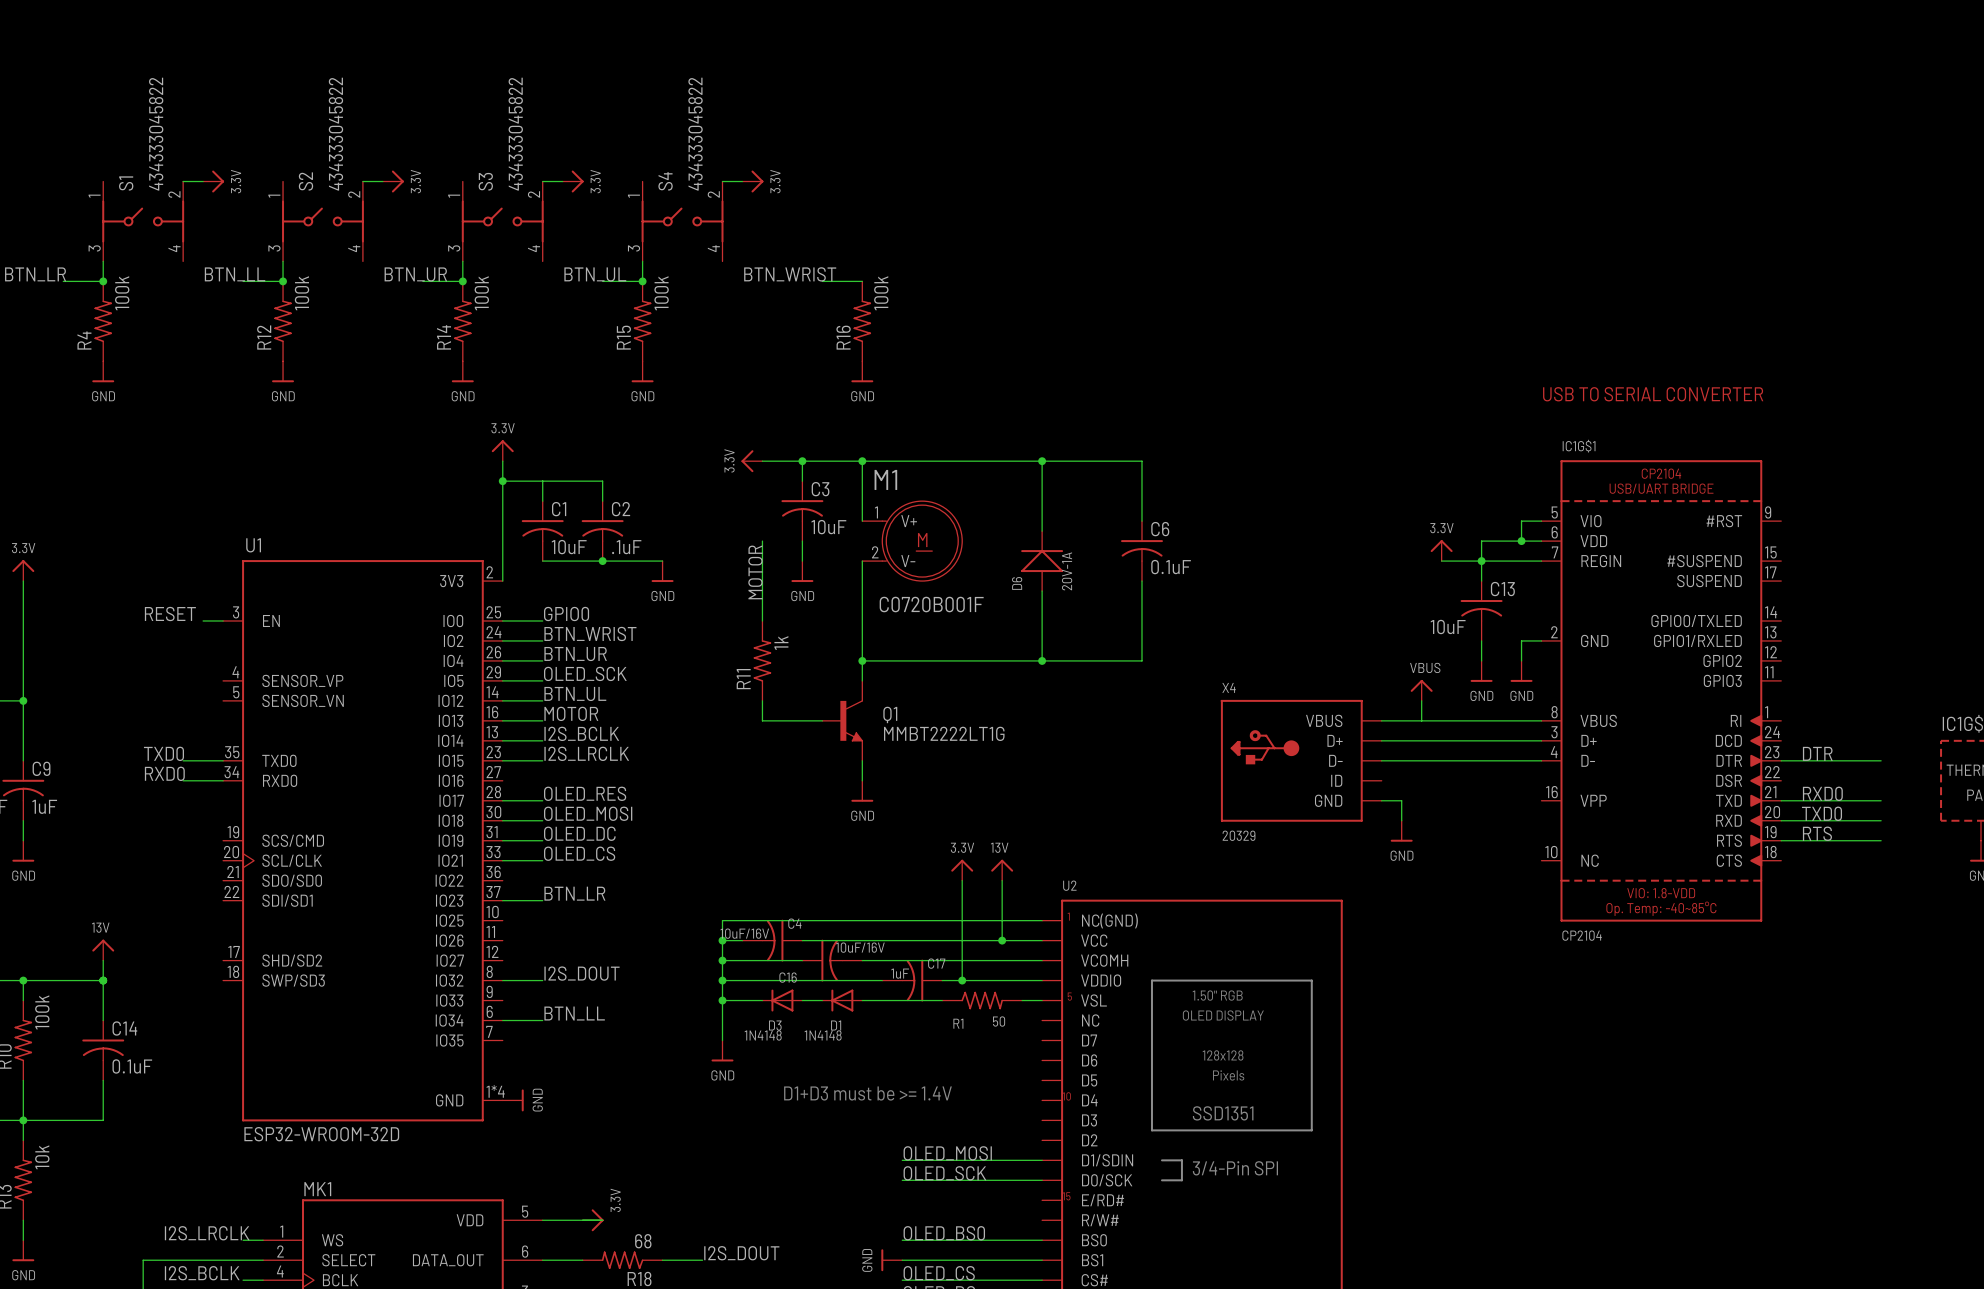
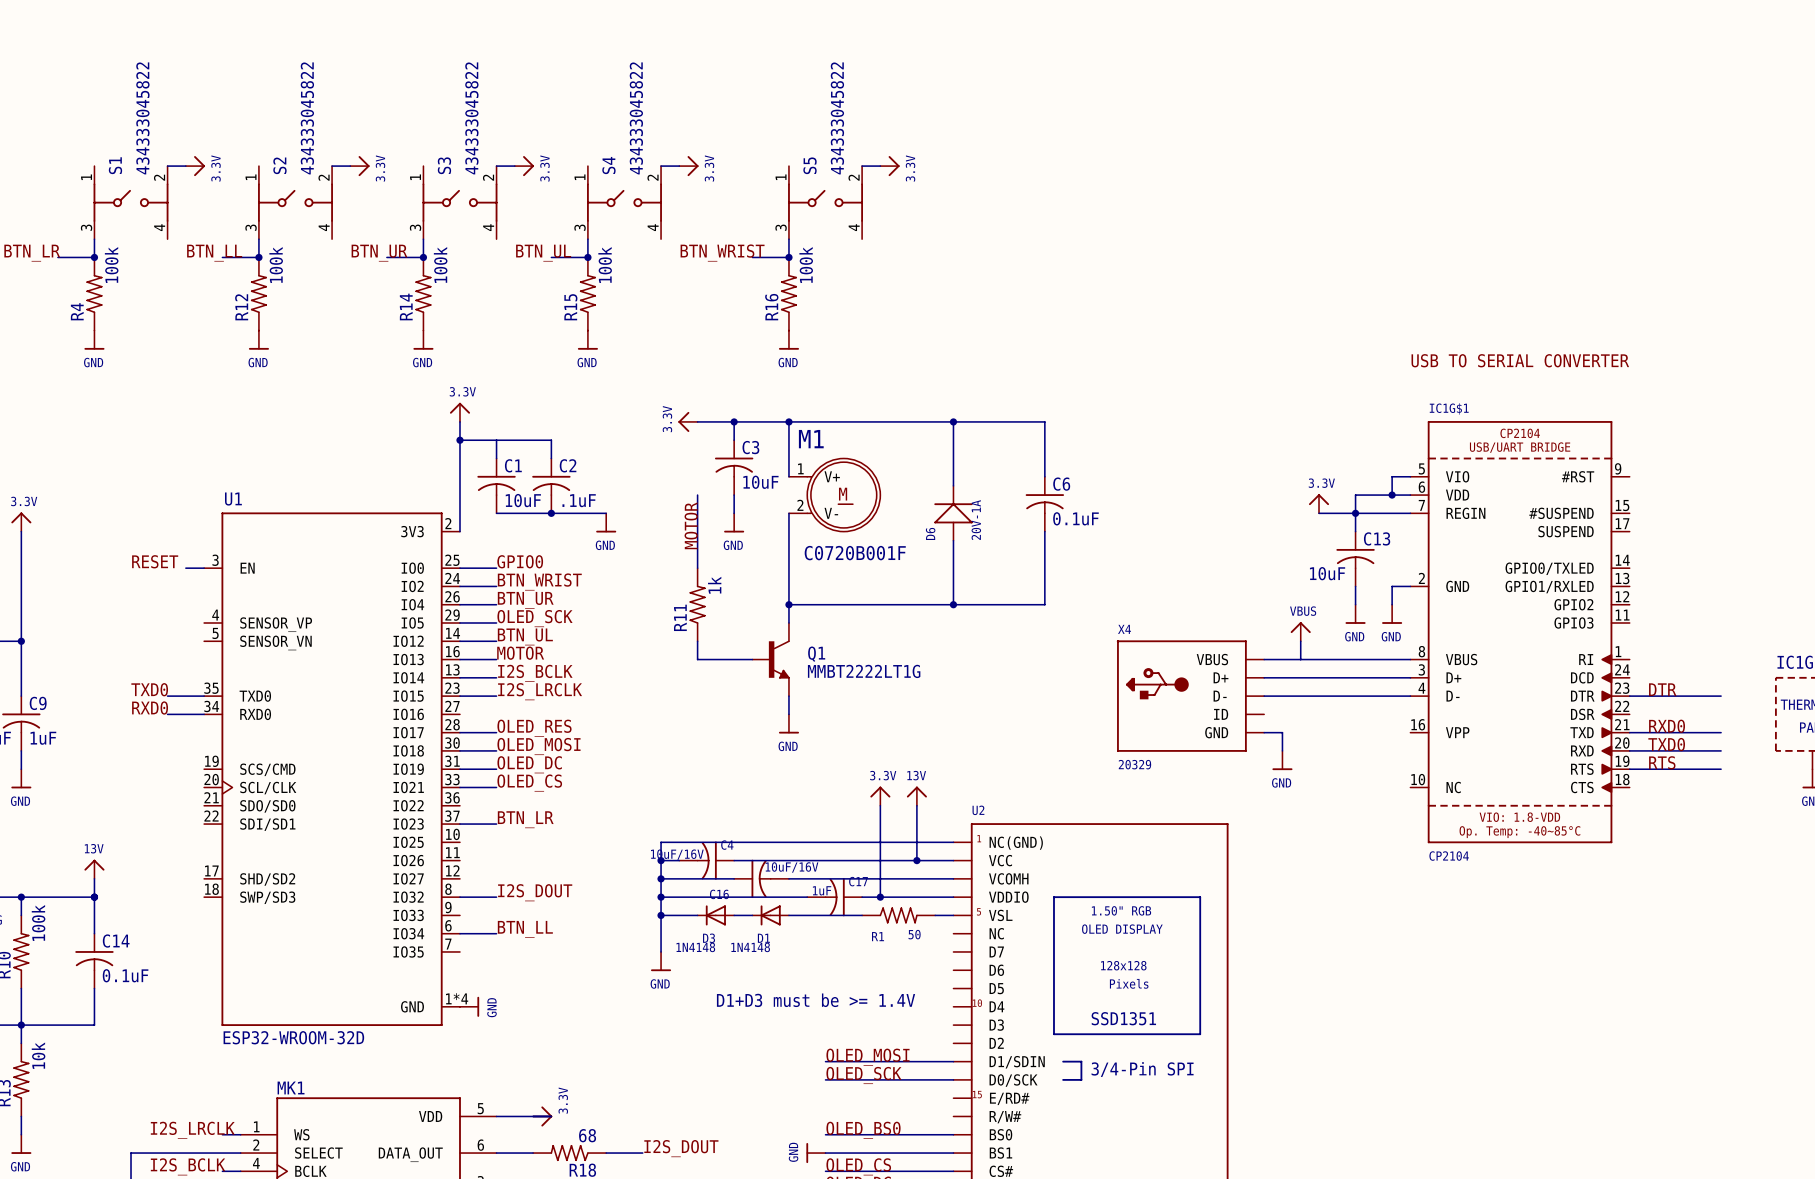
wire: none -> (862, 166) (880, 166)
power symbol: none -> 3.3V (889, 166)
S5: none -> 434333045822 (825, 202)
wire: none -> (788, 239) (788, 257)
junction: none -> (788, 257)

